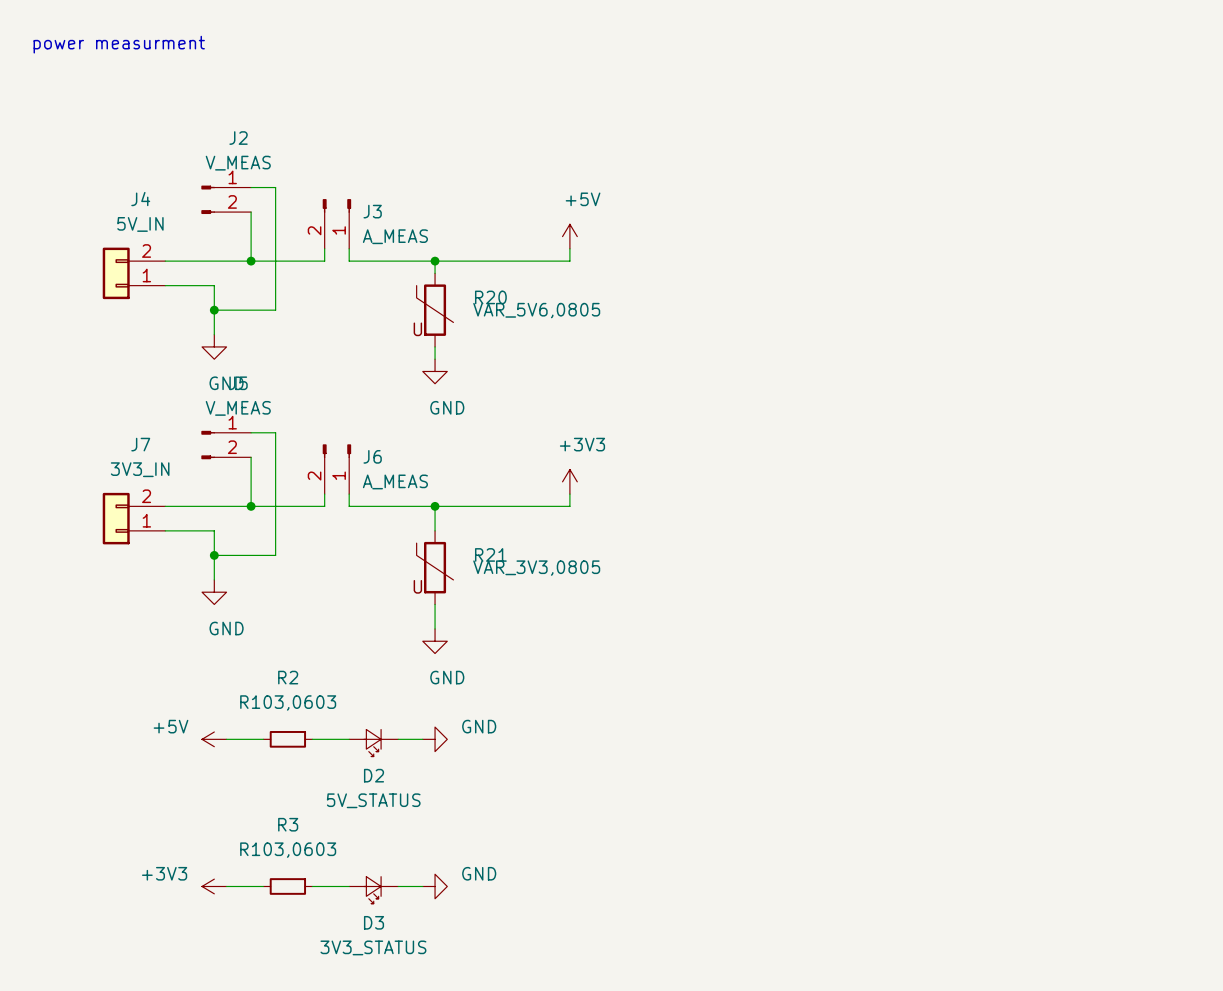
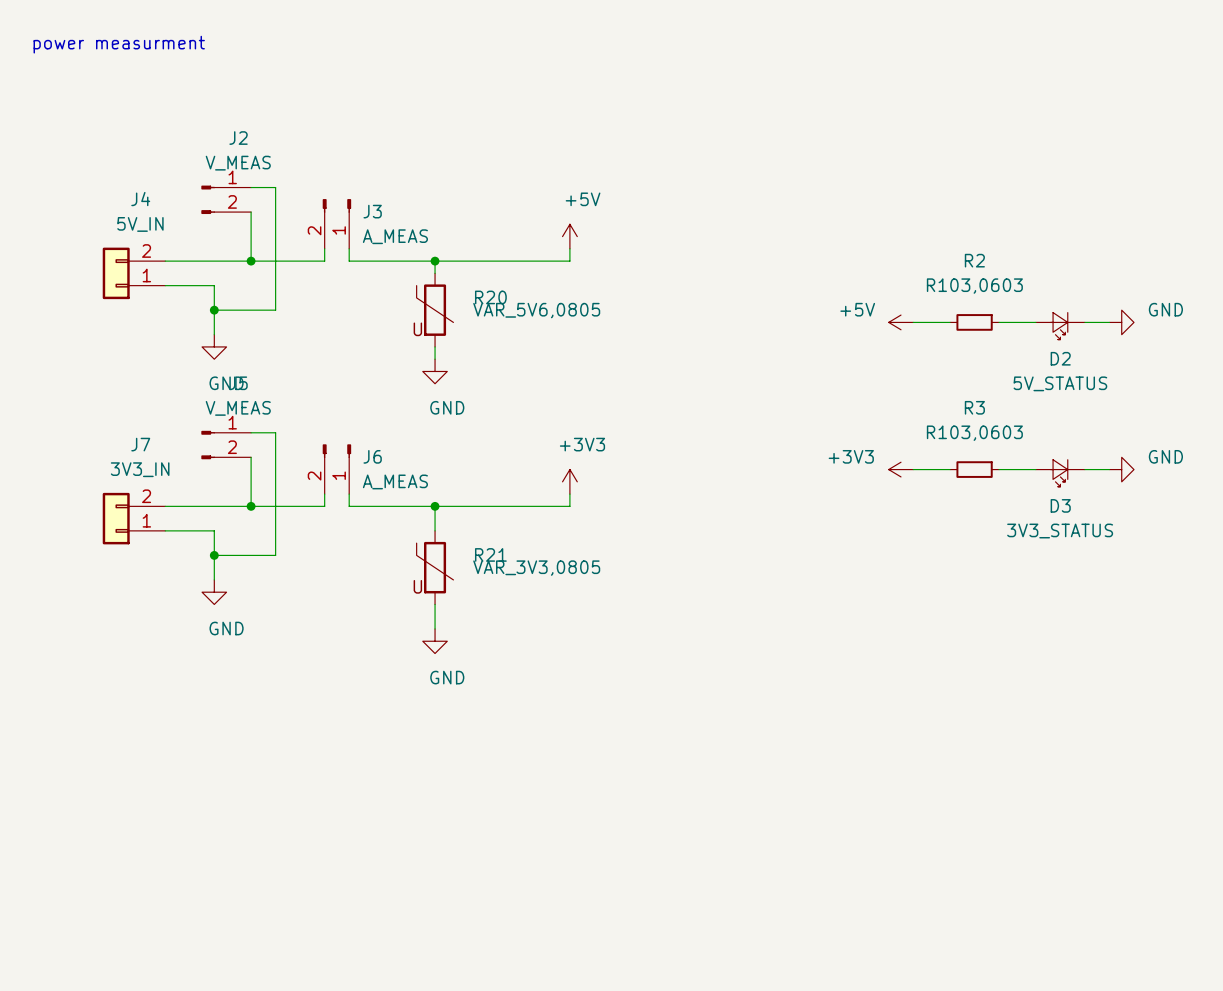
power symbol: none -> +5V (901, 322)
wire: none -> (913, 322) (950, 322)
wire: none -> (999, 322) (1035, 322)
wire: none -> (1084, 322) (1109, 322)
power symbol: none -> GND (1121, 322)
power symbol: none -> +3V3 (901, 469)
wire: none -> (913, 469) (950, 469)
wire: none -> (999, 469) (1035, 469)
wire: none -> (1084, 469) (1109, 469)
power symbol: none -> GND (1121, 469)
power symbol: +5V (214, 739) -> none
wire: (226, 739) (263, 739) -> none
R2 position: (287, 739) -> (974, 322)
wire: (312, 739) (349, 739) -> none
wire: (398, 739) (422, 739) -> none
power symbol: GND (435, 739) -> none
D2 position: (373, 743) -> (1060, 326)
power symbol: +3V3 (214, 886) -> none
wire: (226, 886) (263, 886) -> none
R3 position: (287, 886) -> (974, 469)
wire: (312, 886) (349, 886) -> none
wire: (398, 886) (422, 886) -> none
power symbol: GND (435, 886) -> none
D3 position: (373, 890) -> (1060, 473)

